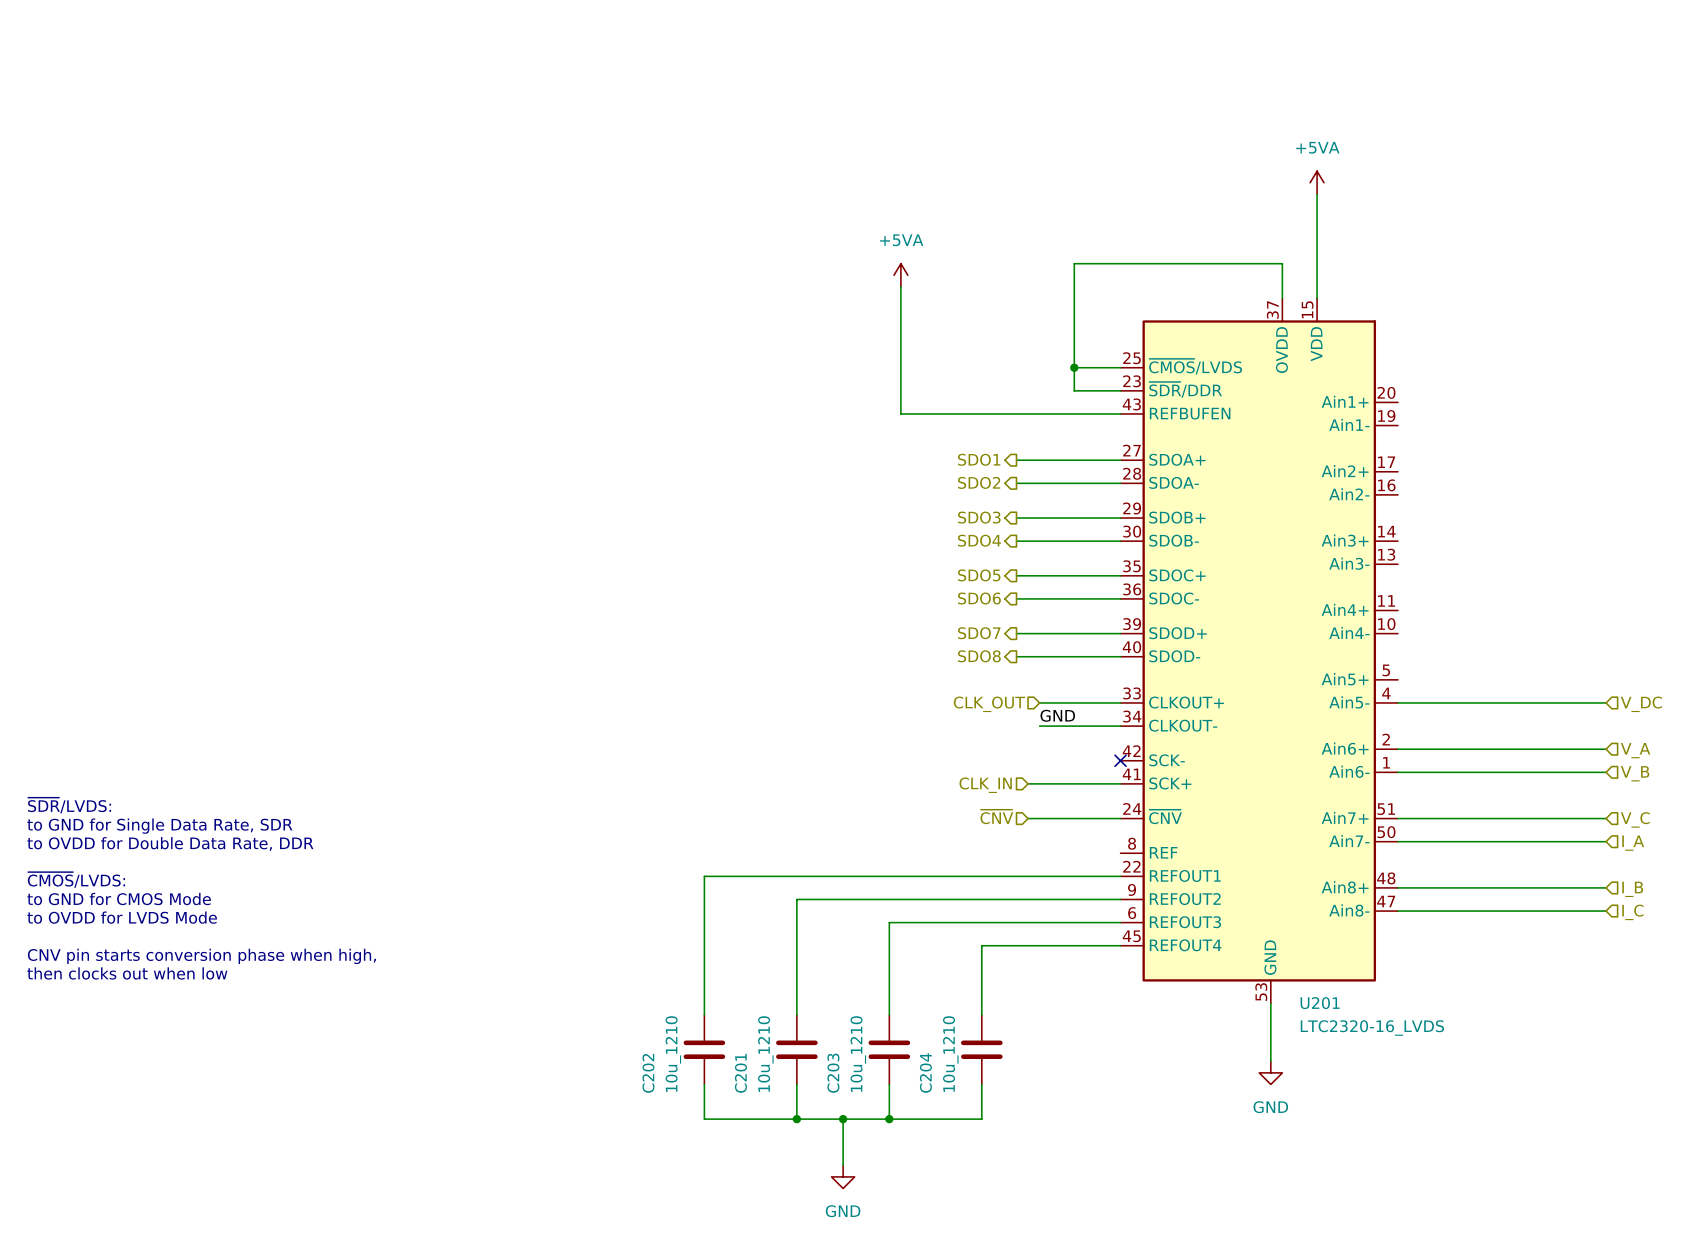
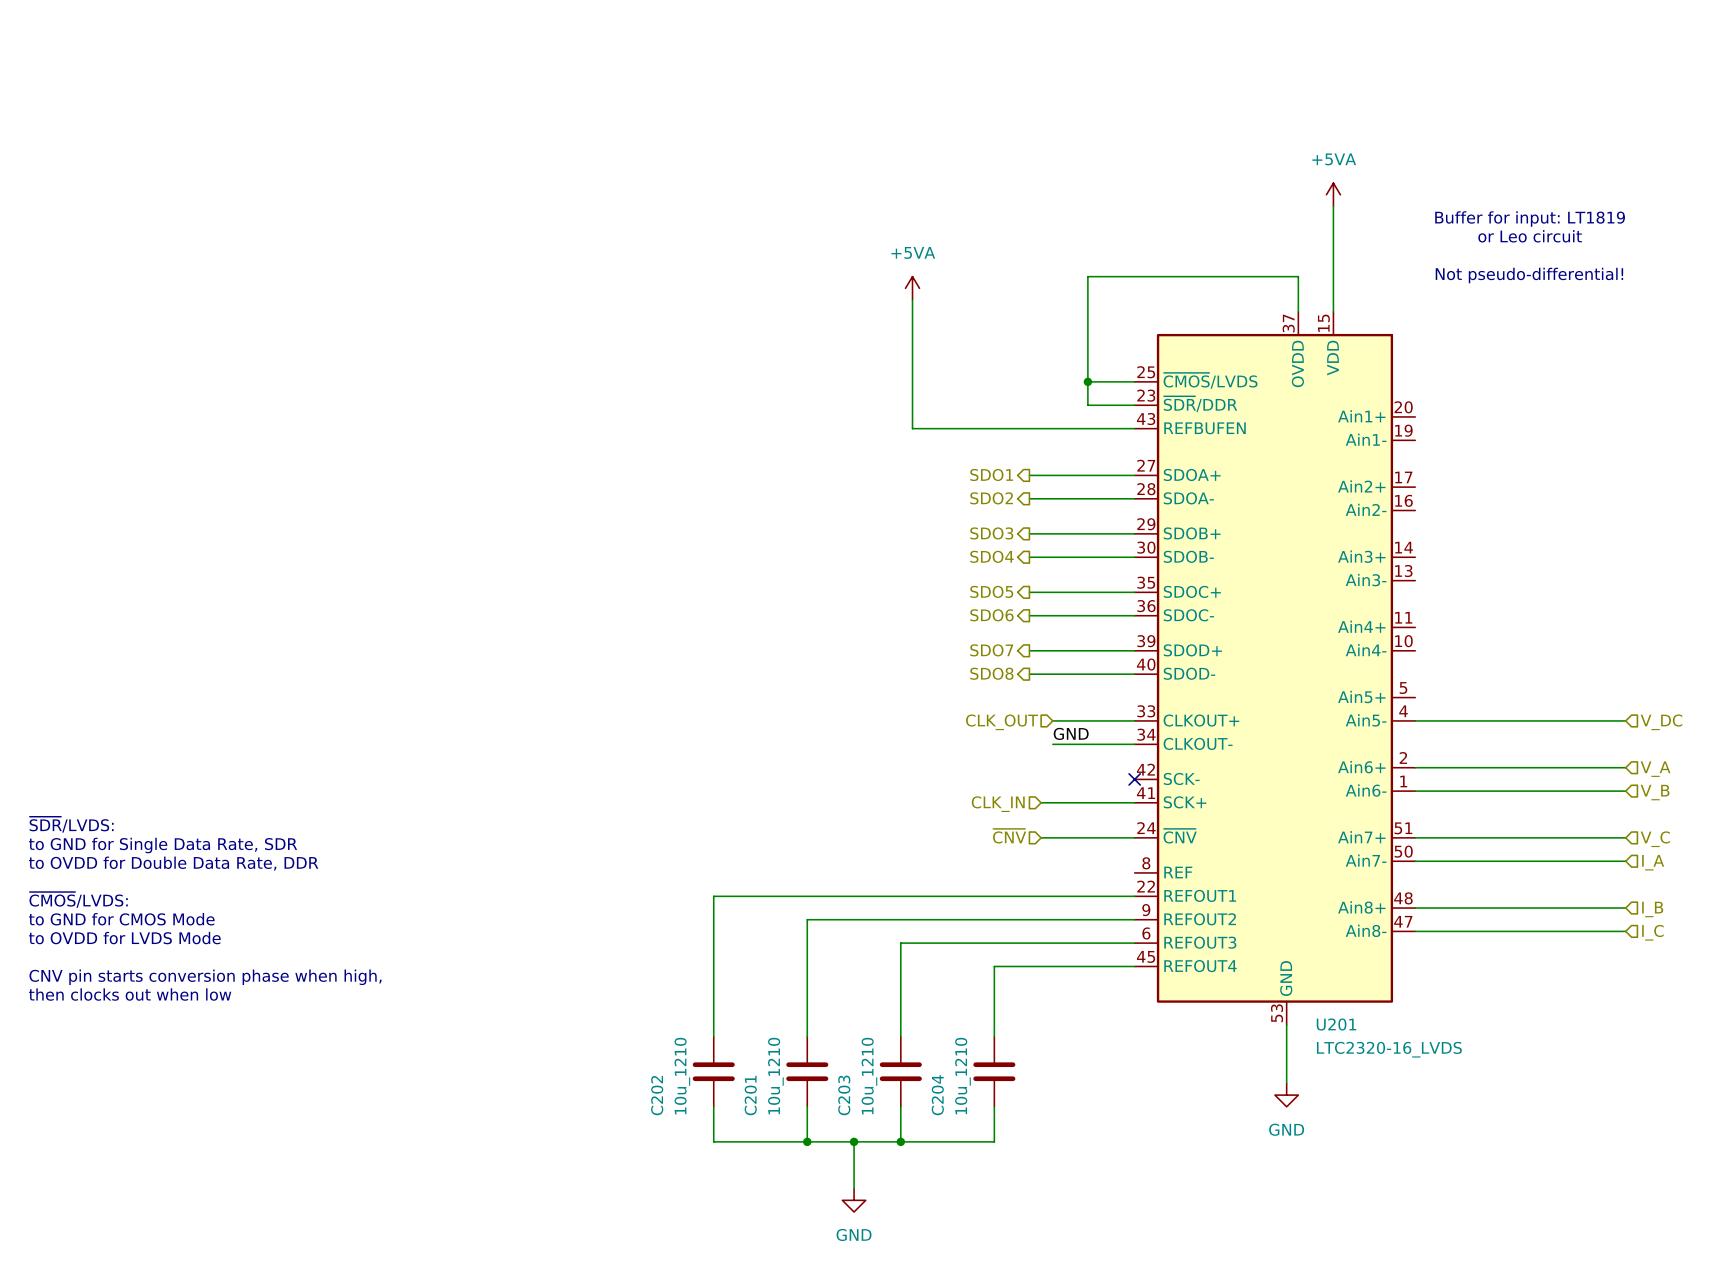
text: none -> Buffer for input: LT1819 (1530, 219)
text: none -> or Leo circuit (1530, 236)
text: none -> Not pseudo-differential! (1529, 275)

